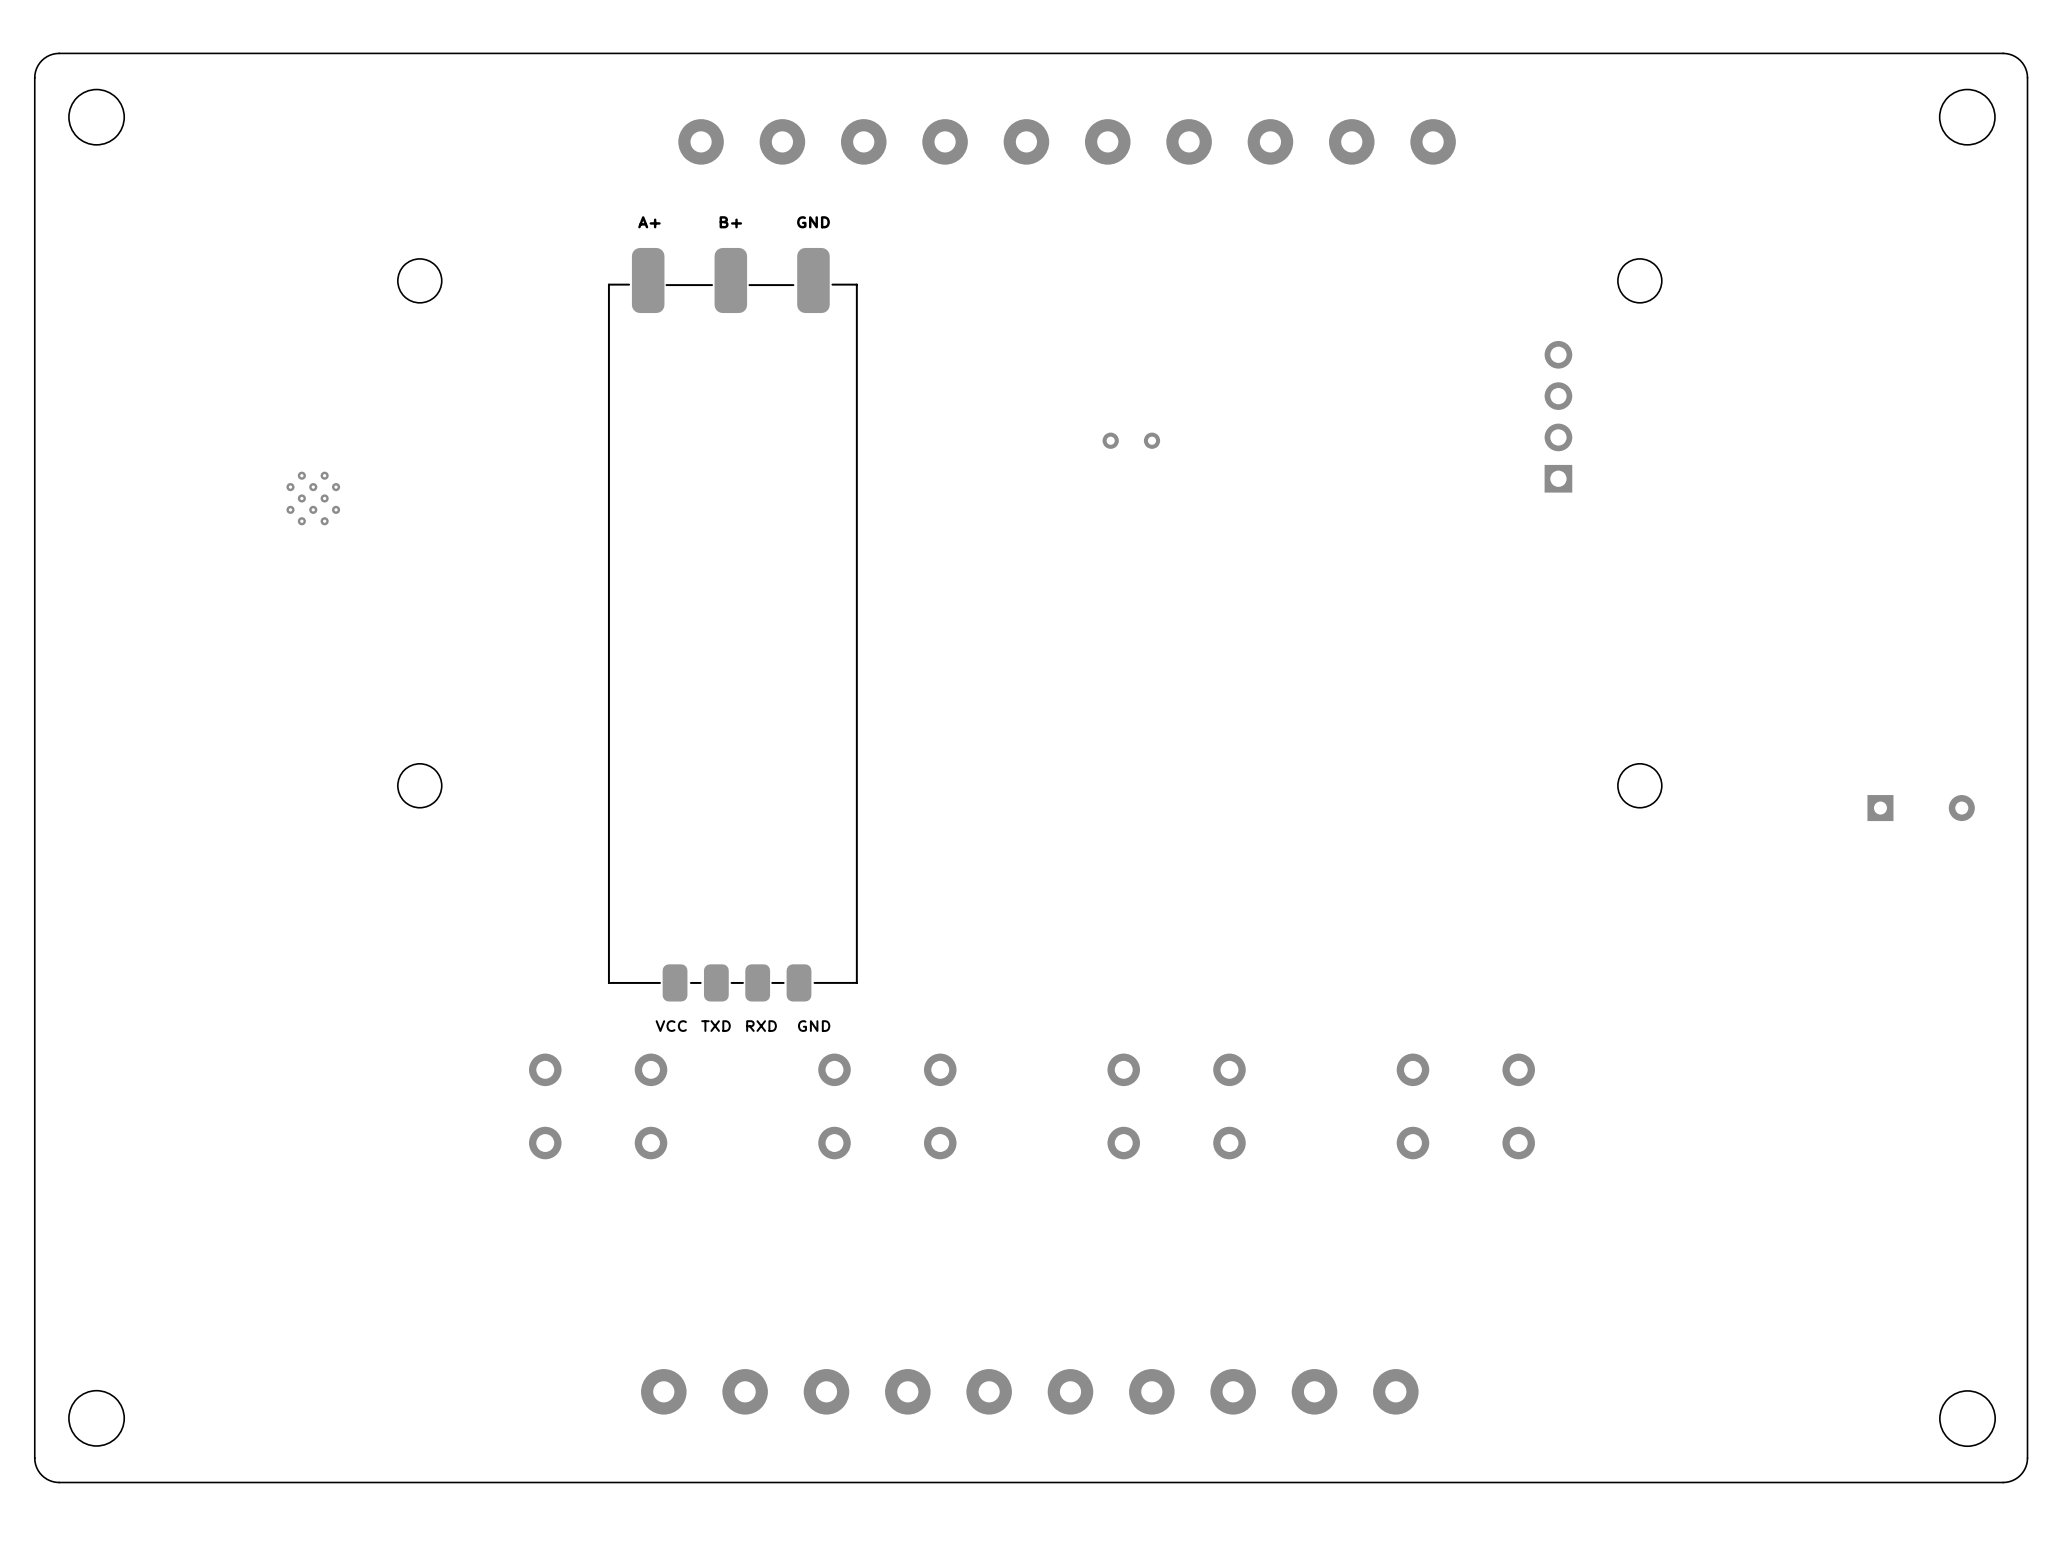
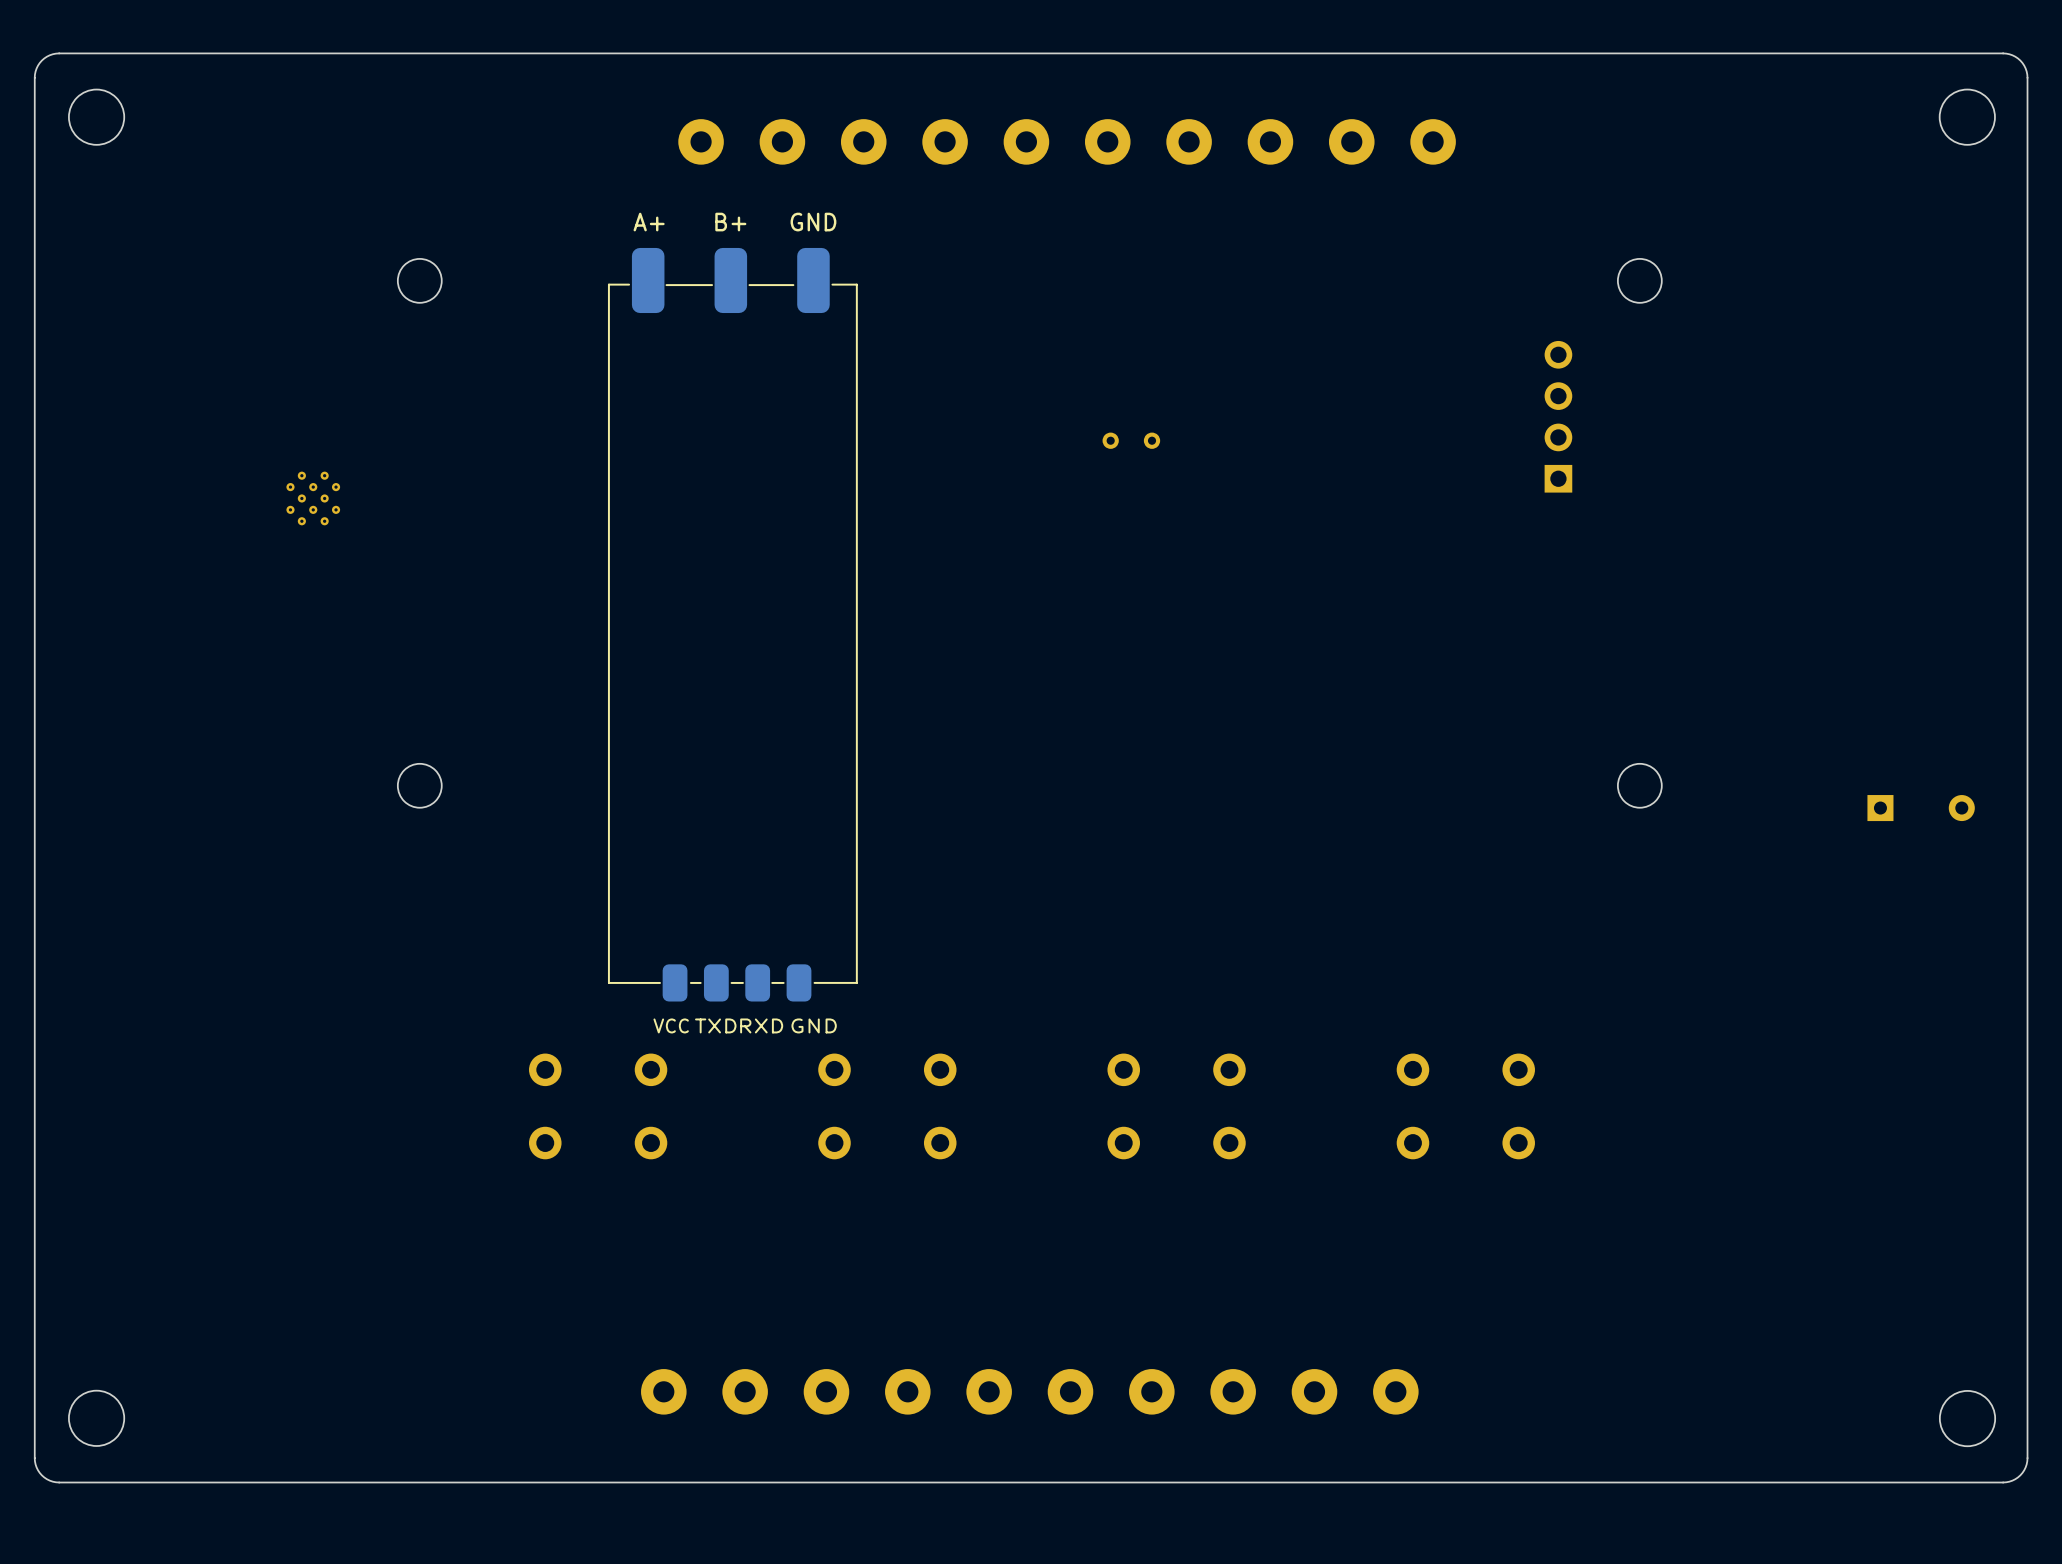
part footprint: [607, 247, 858, 1002] -> [607, 247, 858, 1002]

